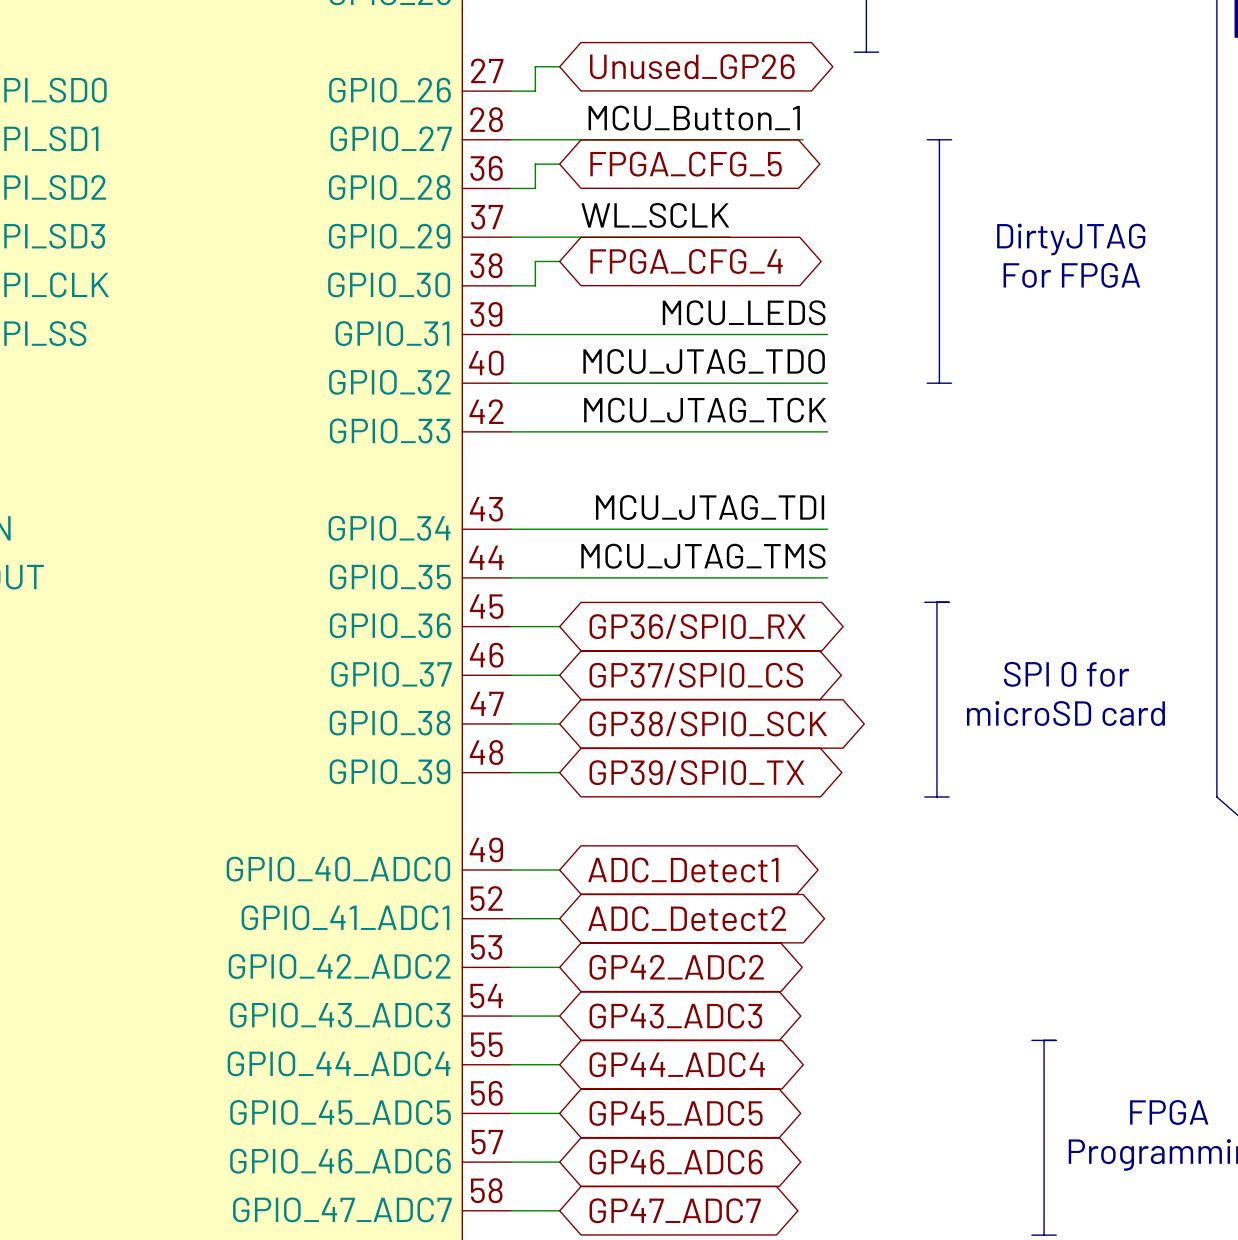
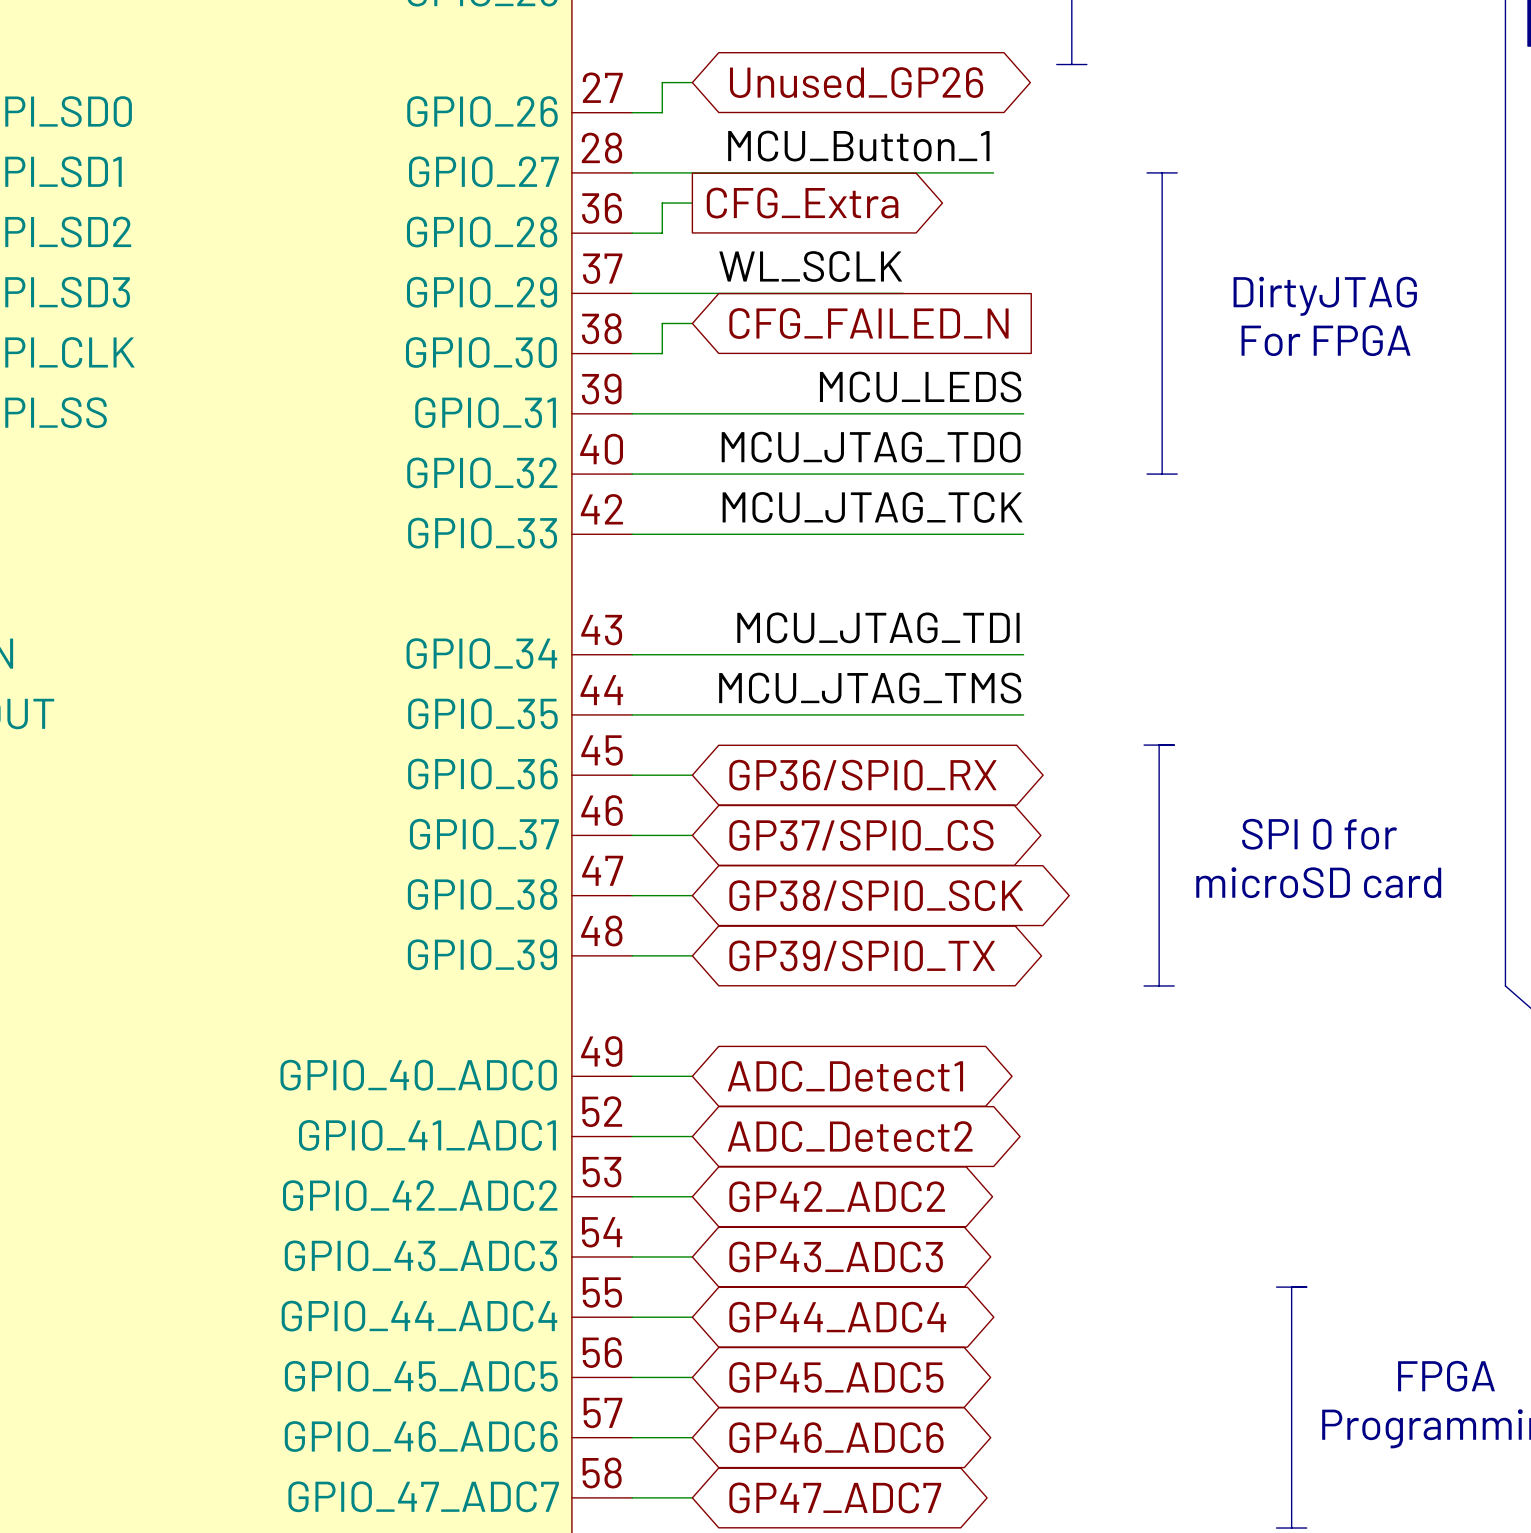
global label shape: bidirectional (686, 164) -> output (802, 203)
global label: FPGA_CFG_5 (686, 164) -> CFG_Extra (802, 203)
global label shape: bidirectional (686, 261) -> input (868, 323)
global label: FPGA_CFG_4 (686, 261) -> CFG_FAILED_N (868, 323)

